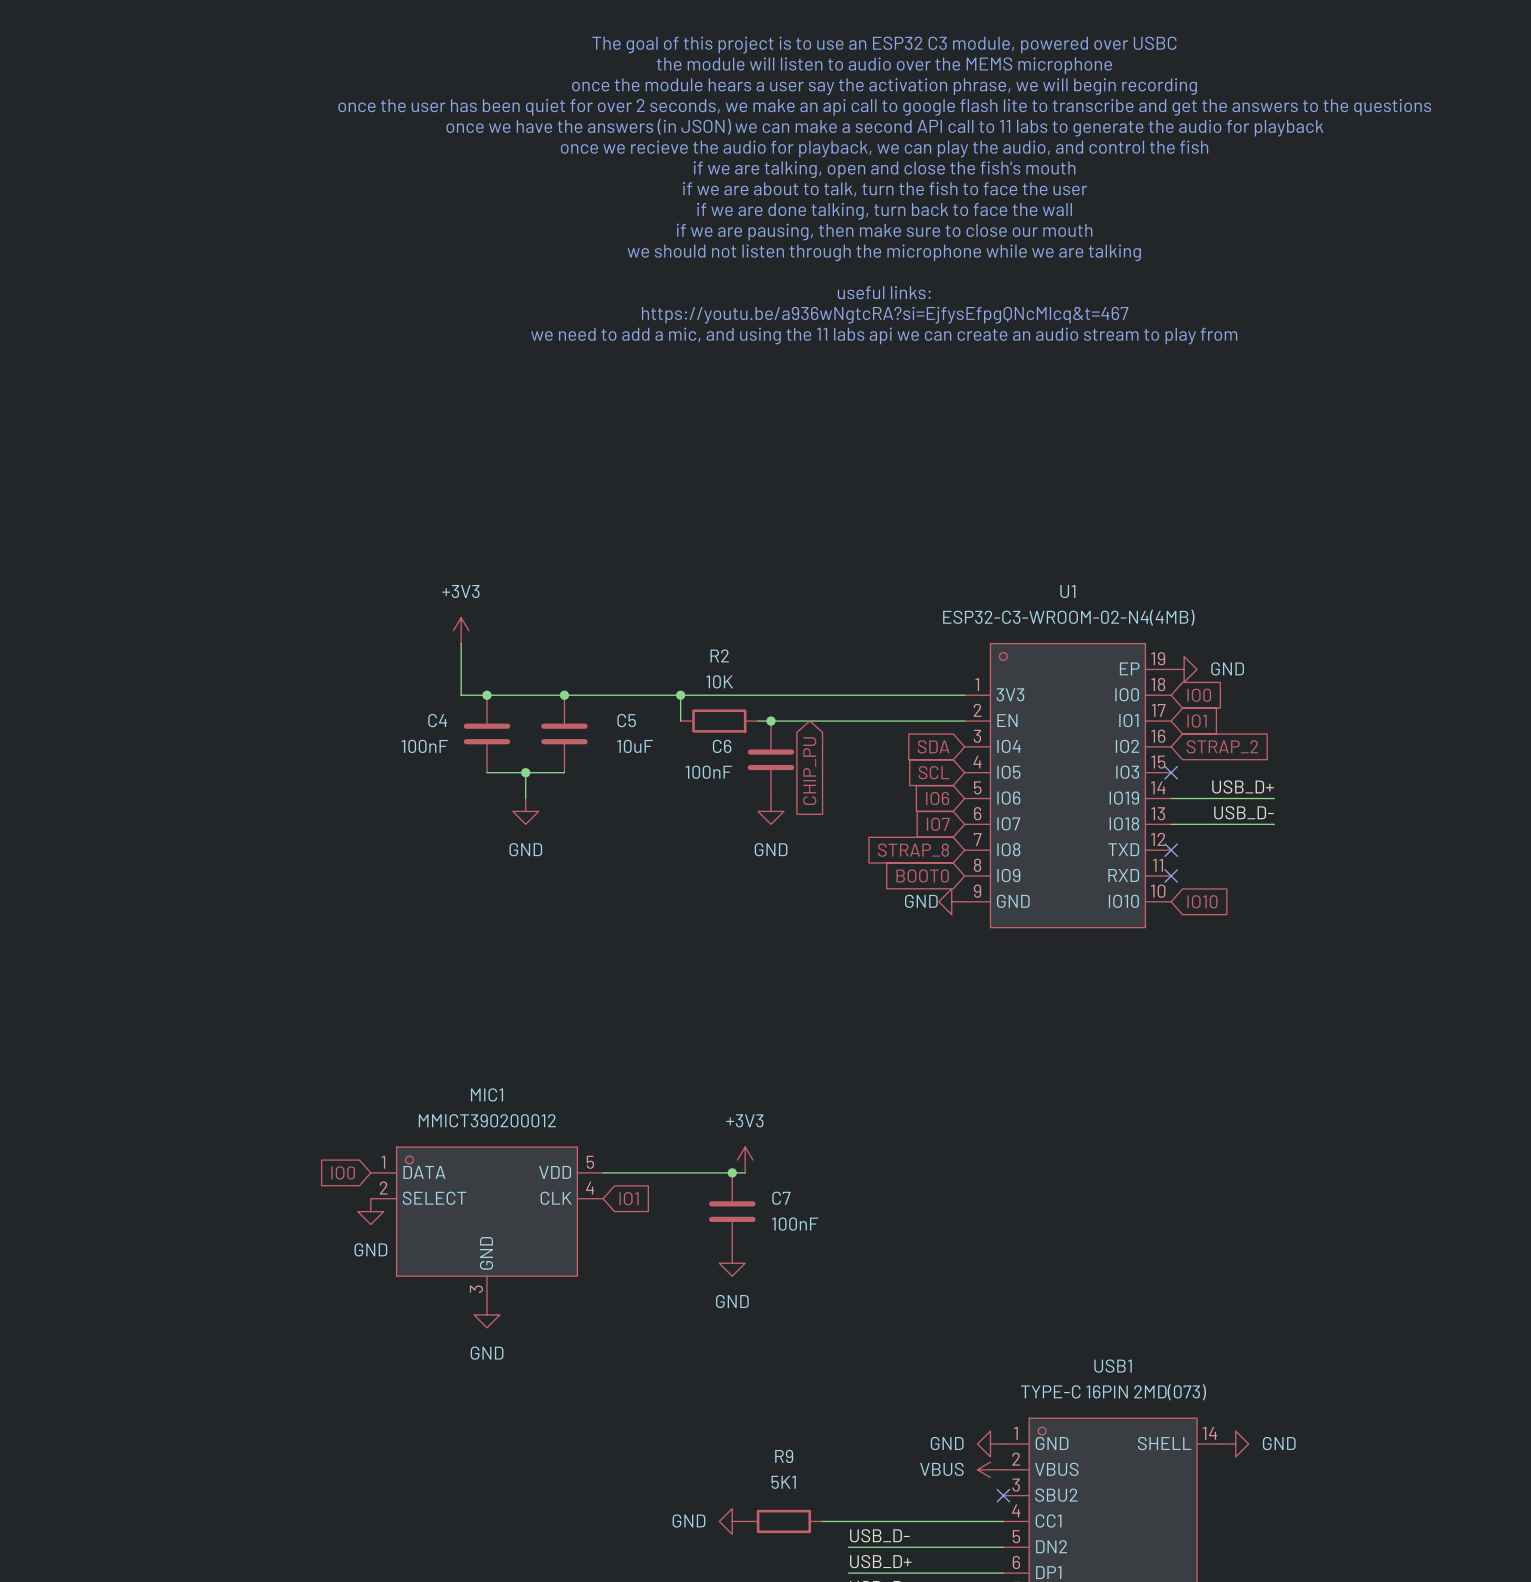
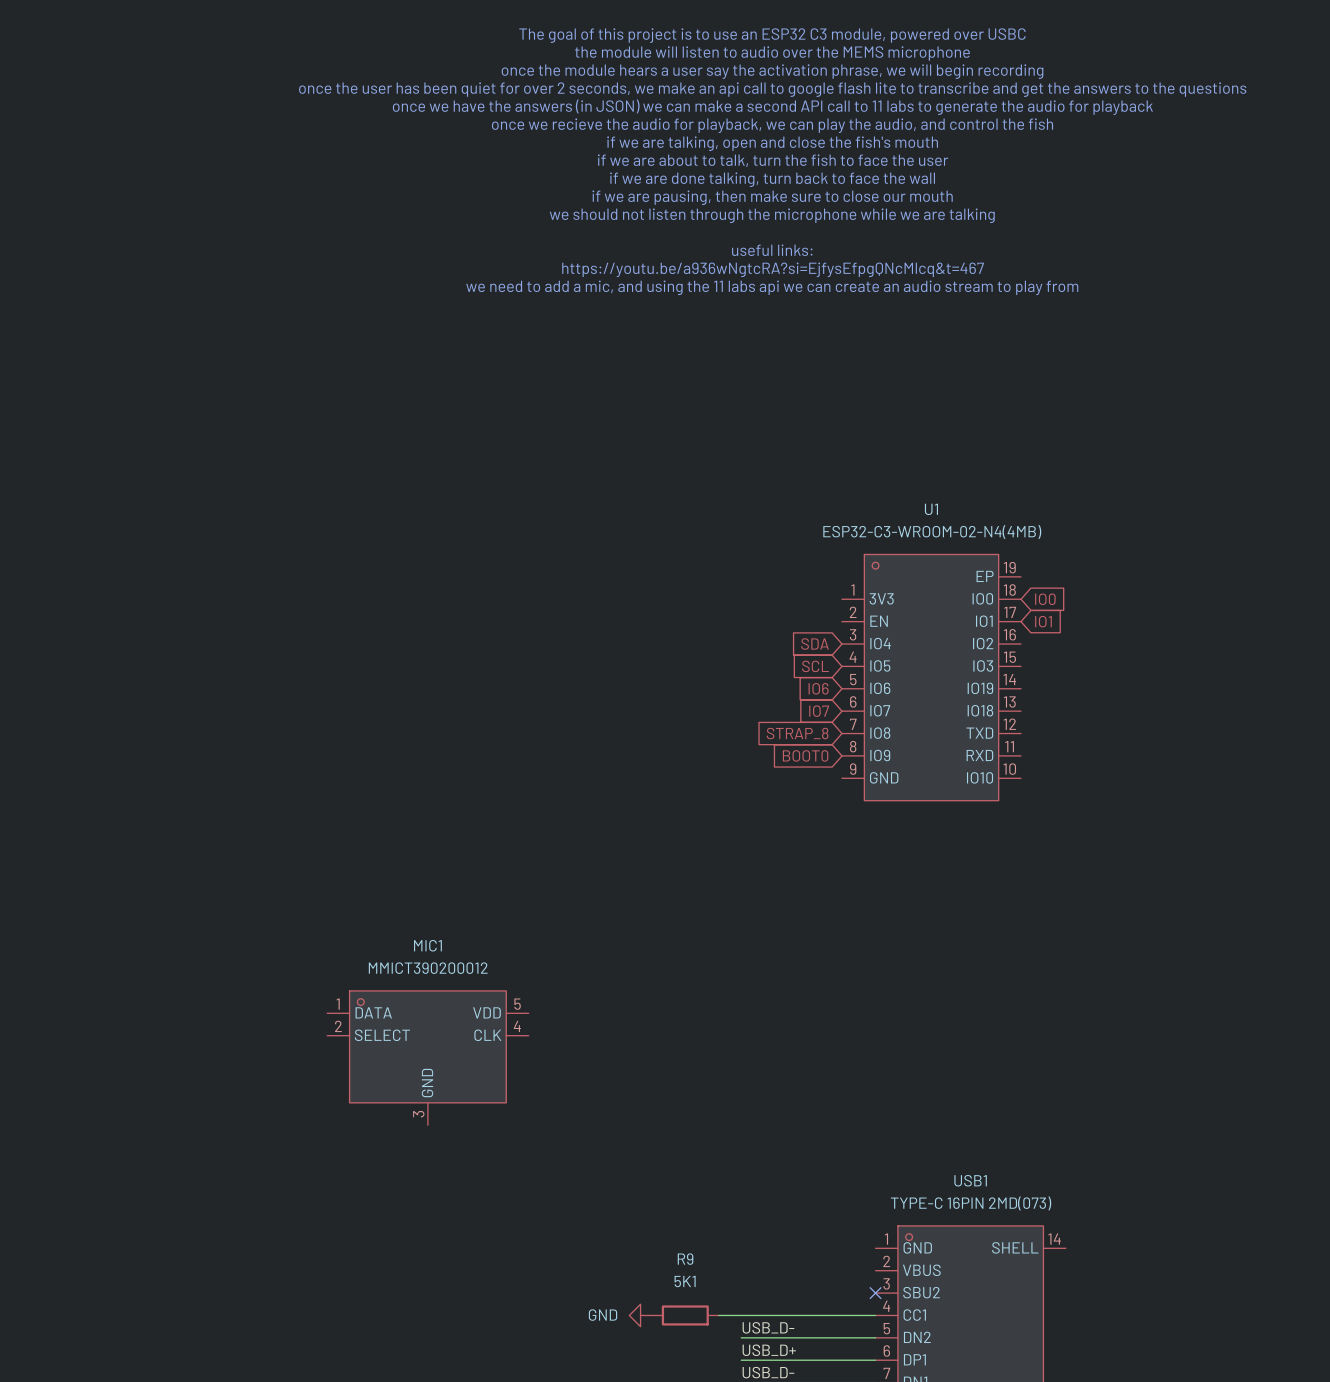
power symbol: +3V3 (461, 630) -> none
wire: (461, 643) (461, 695) (964, 695) -> none
power symbol: GND (1184, 669) -> none
junction: (486, 695) -> none
junction: (564, 695) -> none
wire: (680, 695) (680, 721) -> none
junction: (680, 695) -> none
R2: 10K (719, 721) -> none
wire: (758, 721) (964, 721) -> none
junction: (771, 721) -> none
C4: 100nF (486, 733) -> none
C5: 10uF (564, 733) -> none
global label: STRAP_2 (1222, 746) -> none
C6: 100nF (771, 759) -> none
global label: CHIP_PU (809, 771) -> none
wire: (486, 772) (564, 772) -> none
wire: (525, 772) (525, 798) -> none
junction: (525, 772) -> none
no-connect mark: (1171, 772) -> none
label: USB_D+ (1243, 786) -> none
wire: (1171, 798) (1274, 798) -> none
power symbol: GND (525, 811) -> none
power symbol: GND (771, 811) -> none
label: USB_D- (1243, 812) -> none
wire: (1171, 824) (1274, 824) -> none
no-connect mark: (1171, 850) -> none
no-connect mark: (1171, 875) -> none
power symbol: GND (951, 901) -> none
global label: IO10 (1202, 901) -> none
power symbol: +3V3 (745, 1159) -> none
global label: IO0 (343, 1172) -> none
wire: (603, 1172) (745, 1172) -> none
junction: (732, 1172) -> none
global label: IO1 (629, 1198) -> none
power symbol: GND (370, 1211) -> none
C7: 100nF (732, 1211) -> none
power symbol: GND (732, 1263) -> none
power symbol: GND (486, 1314) -> none
power symbol: GND (990, 1444) -> none
power symbol: GND (1235, 1444) -> none
power symbol: VBUS (990, 1469) -> none

